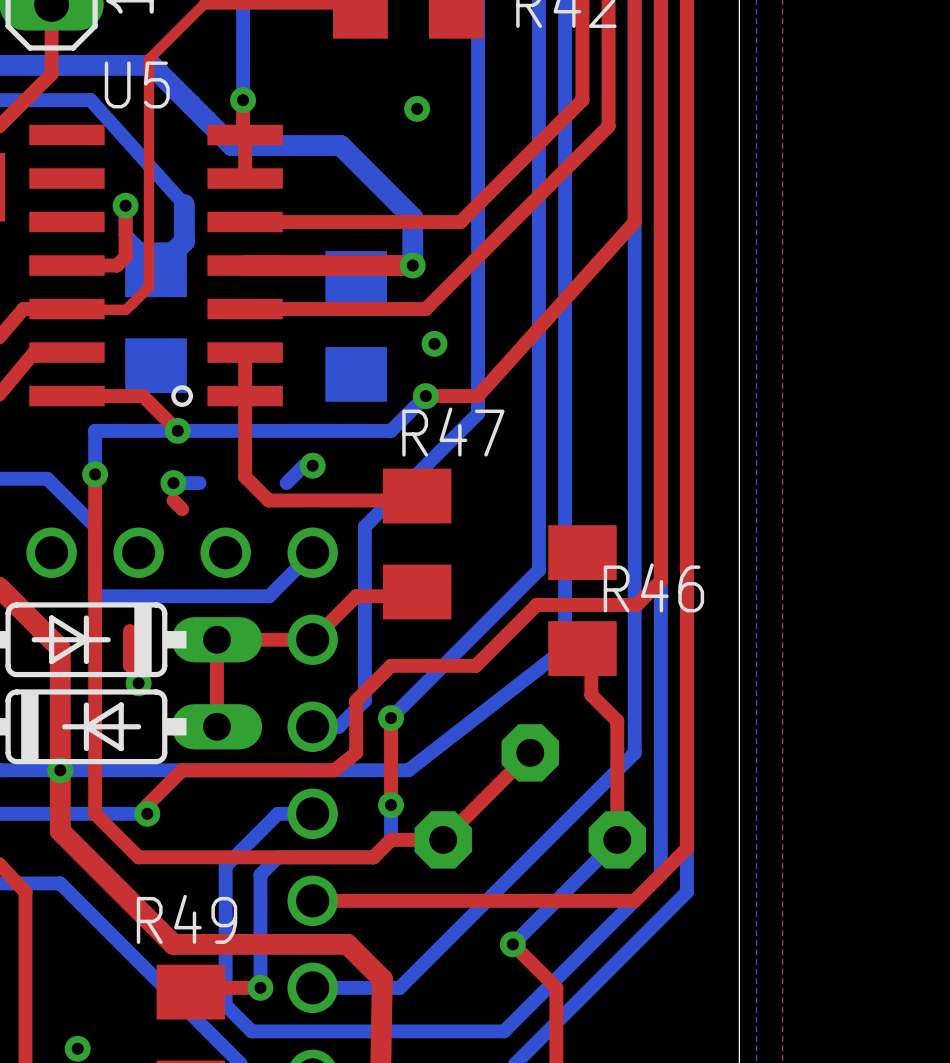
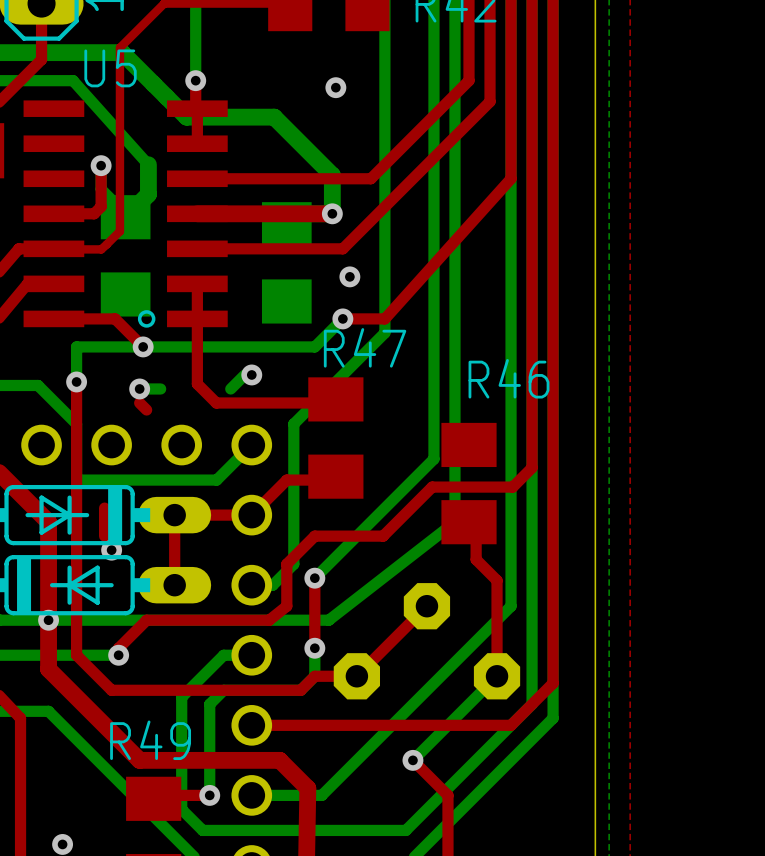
R46 name position: R46 (653, 587) -> R46 (508, 378)

